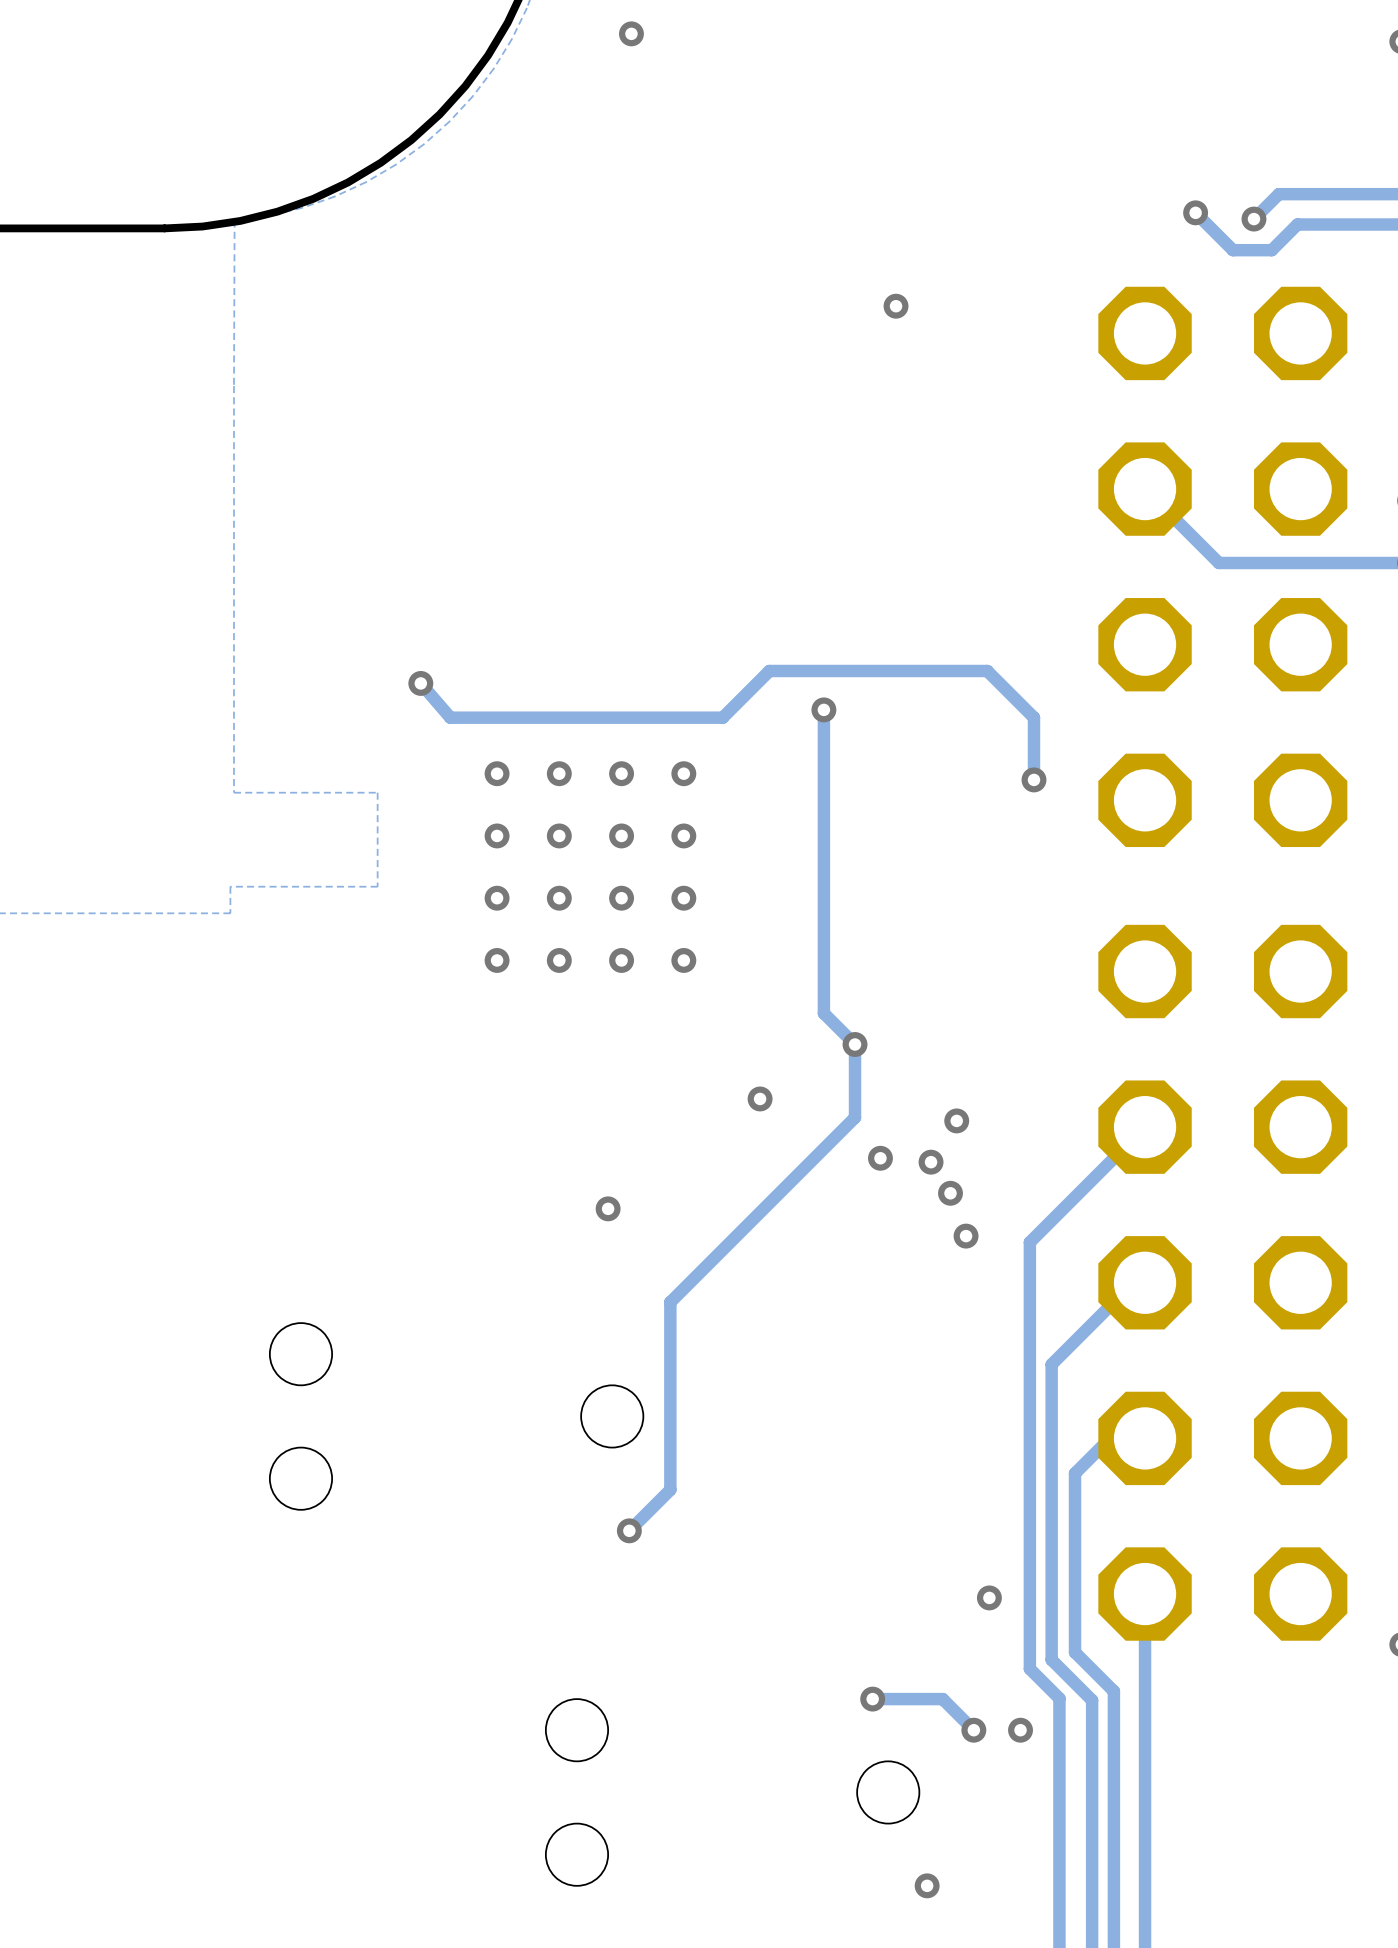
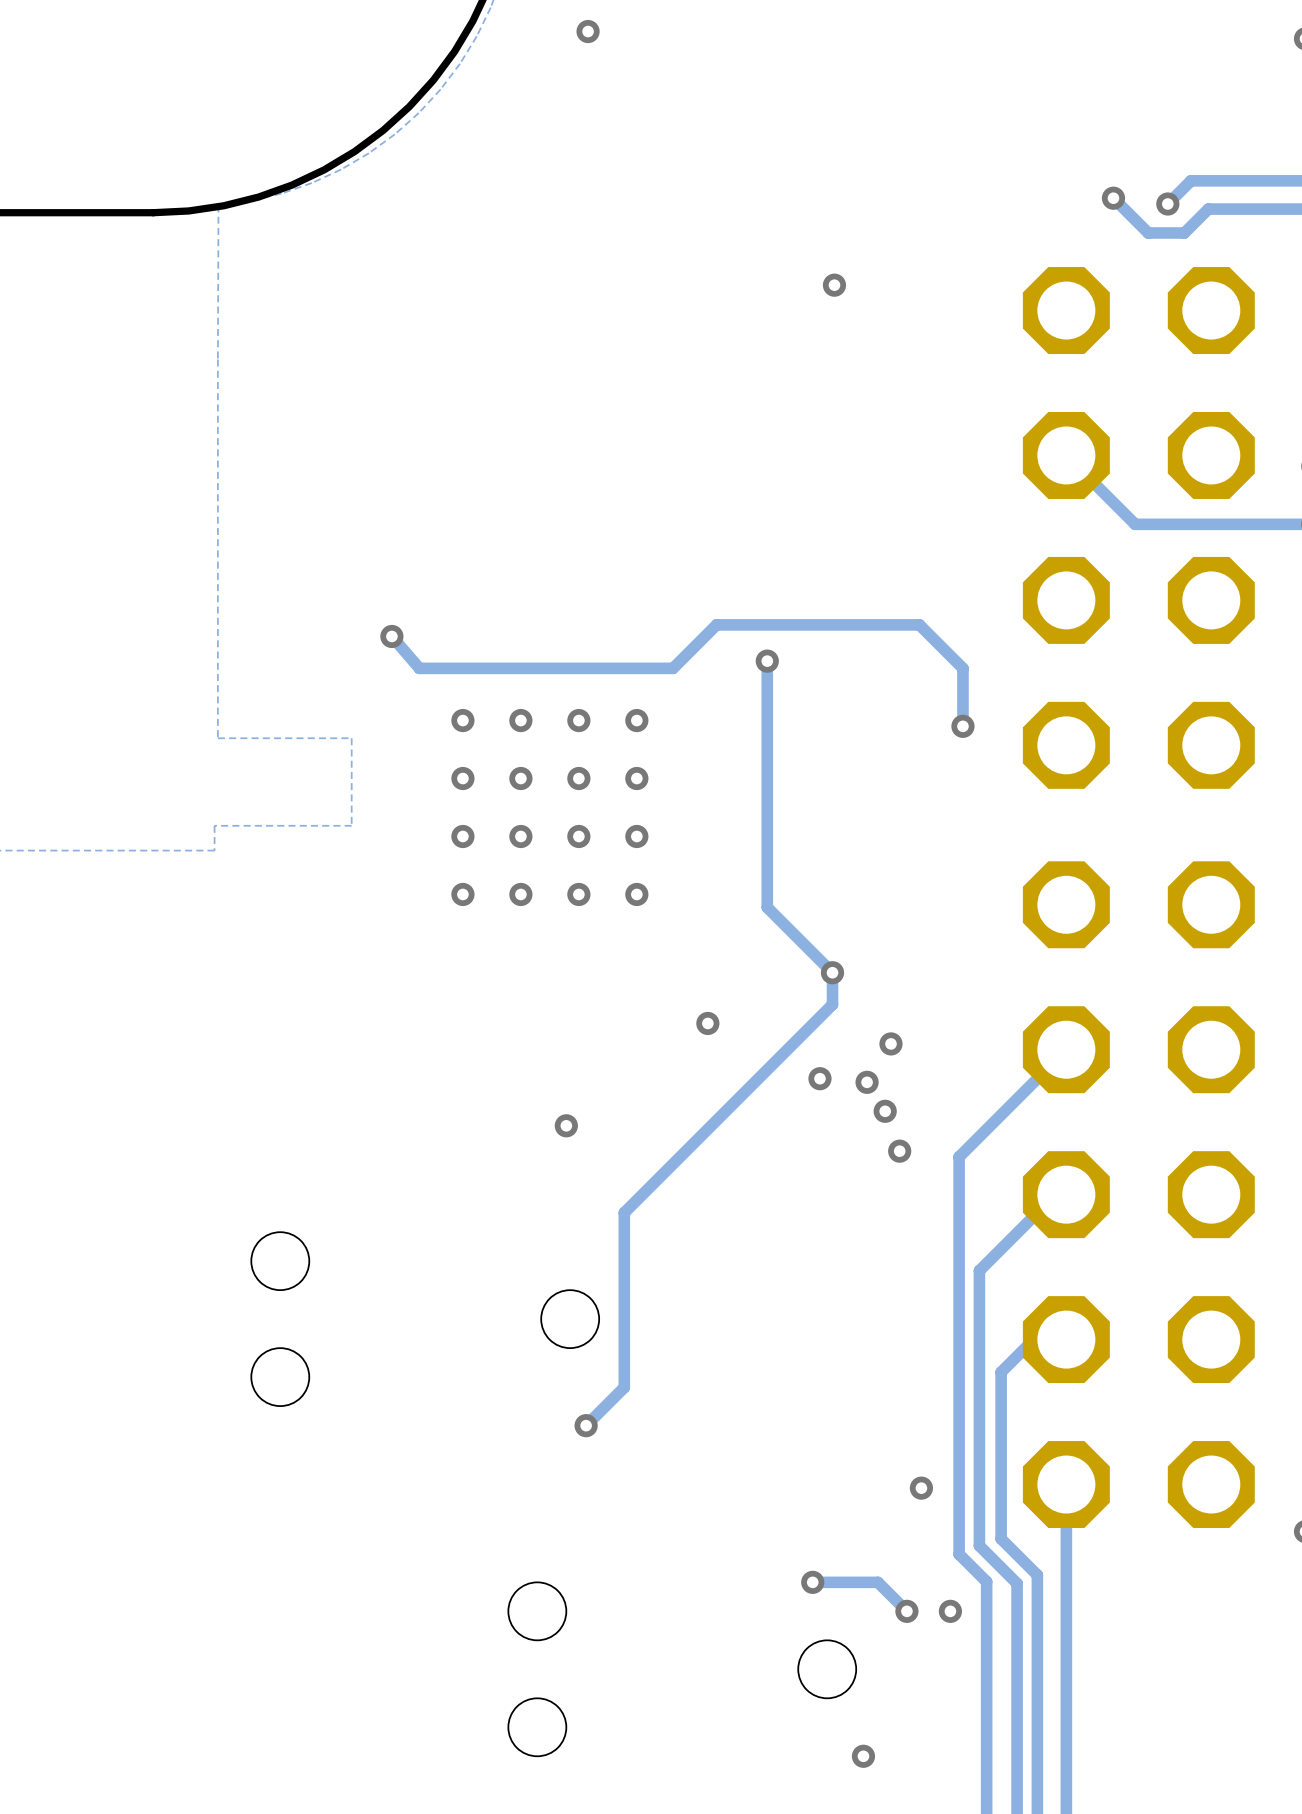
track: (823, 974) (823, 1013) (855, 1044) (855, 1117) -> (767, 907) (832, 972) (832, 1004) (796, 1040)
via position: (855, 1044) -> (832, 972)

